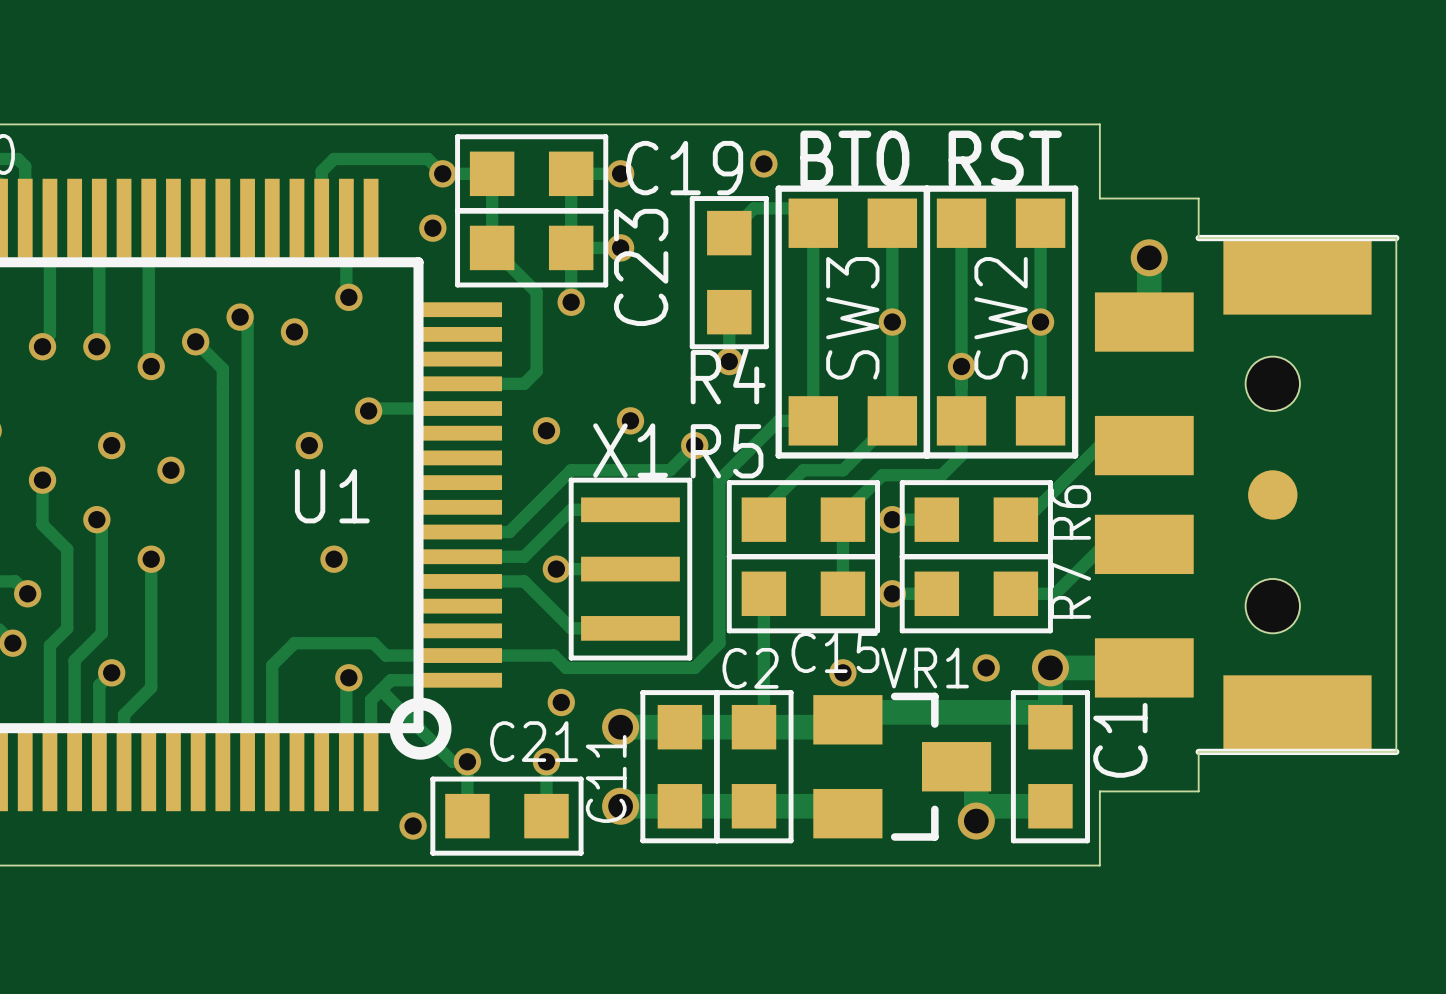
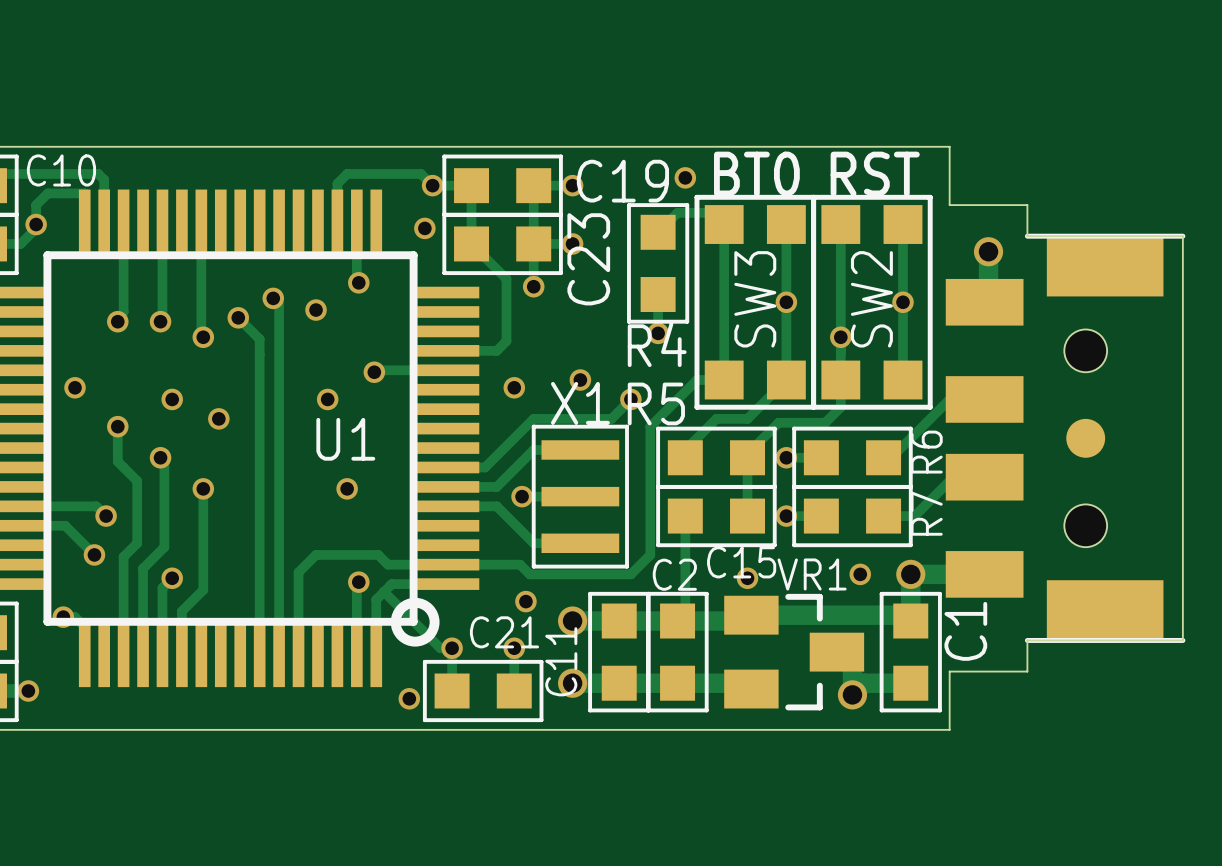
track: (852, 712) (1050, 712) -> none
track: none -> (751, 615) (904, 615) (910, 621)

